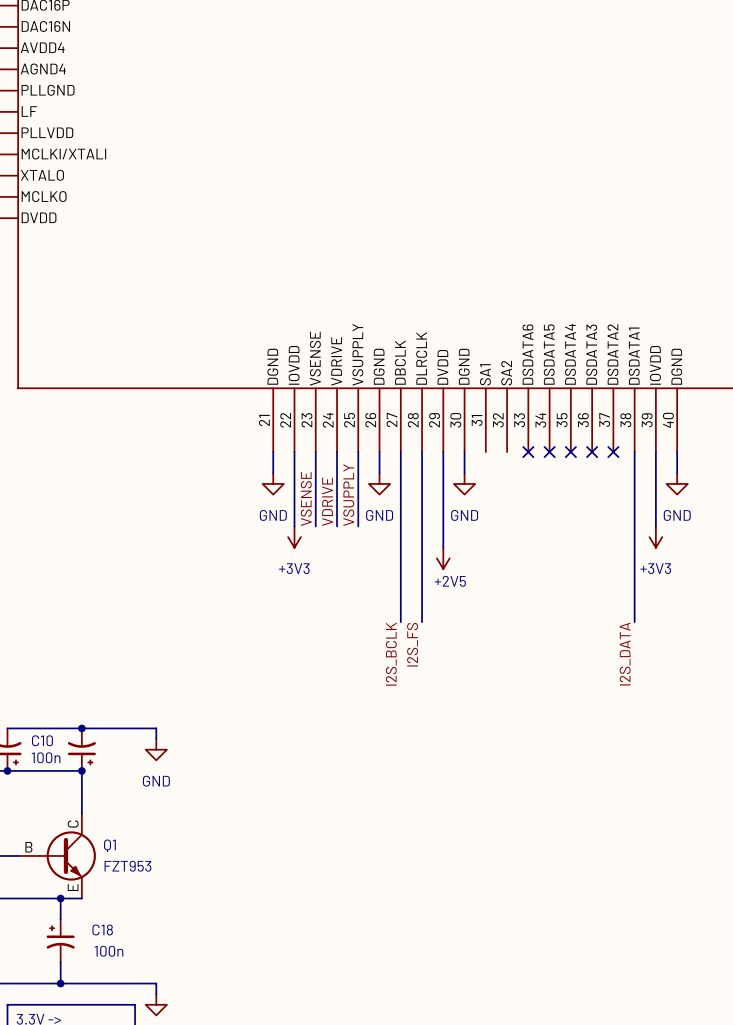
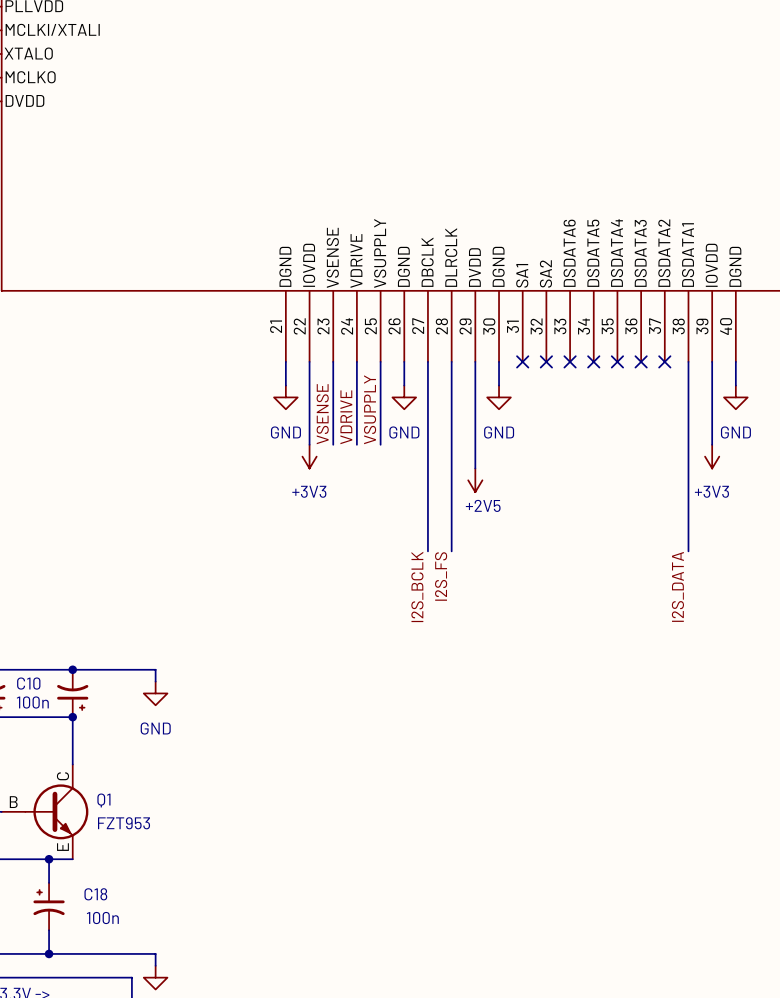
no-connect mark: none -> (522, 361)
no-connect mark: none -> (546, 361)

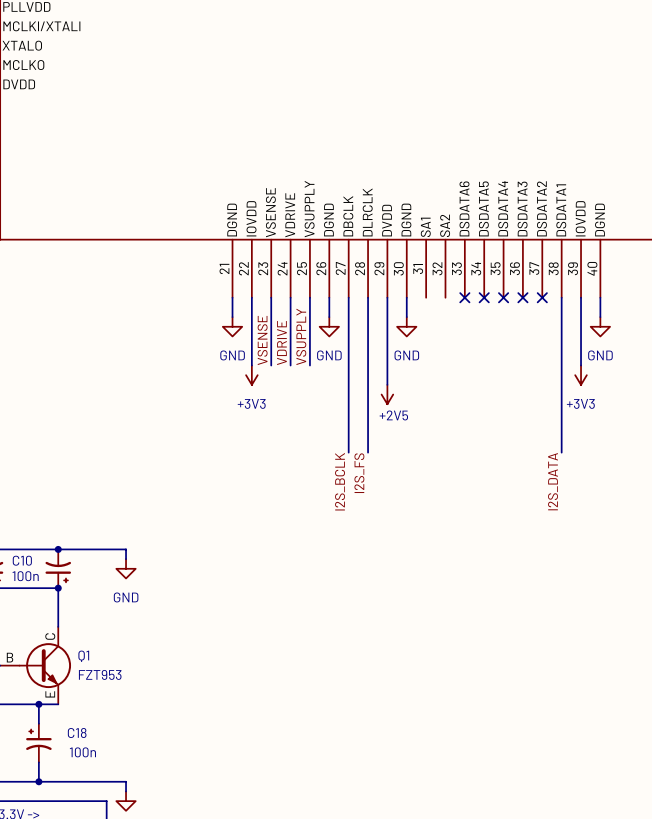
no-connect mark: (522, 361) -> none
no-connect mark: (546, 361) -> none

